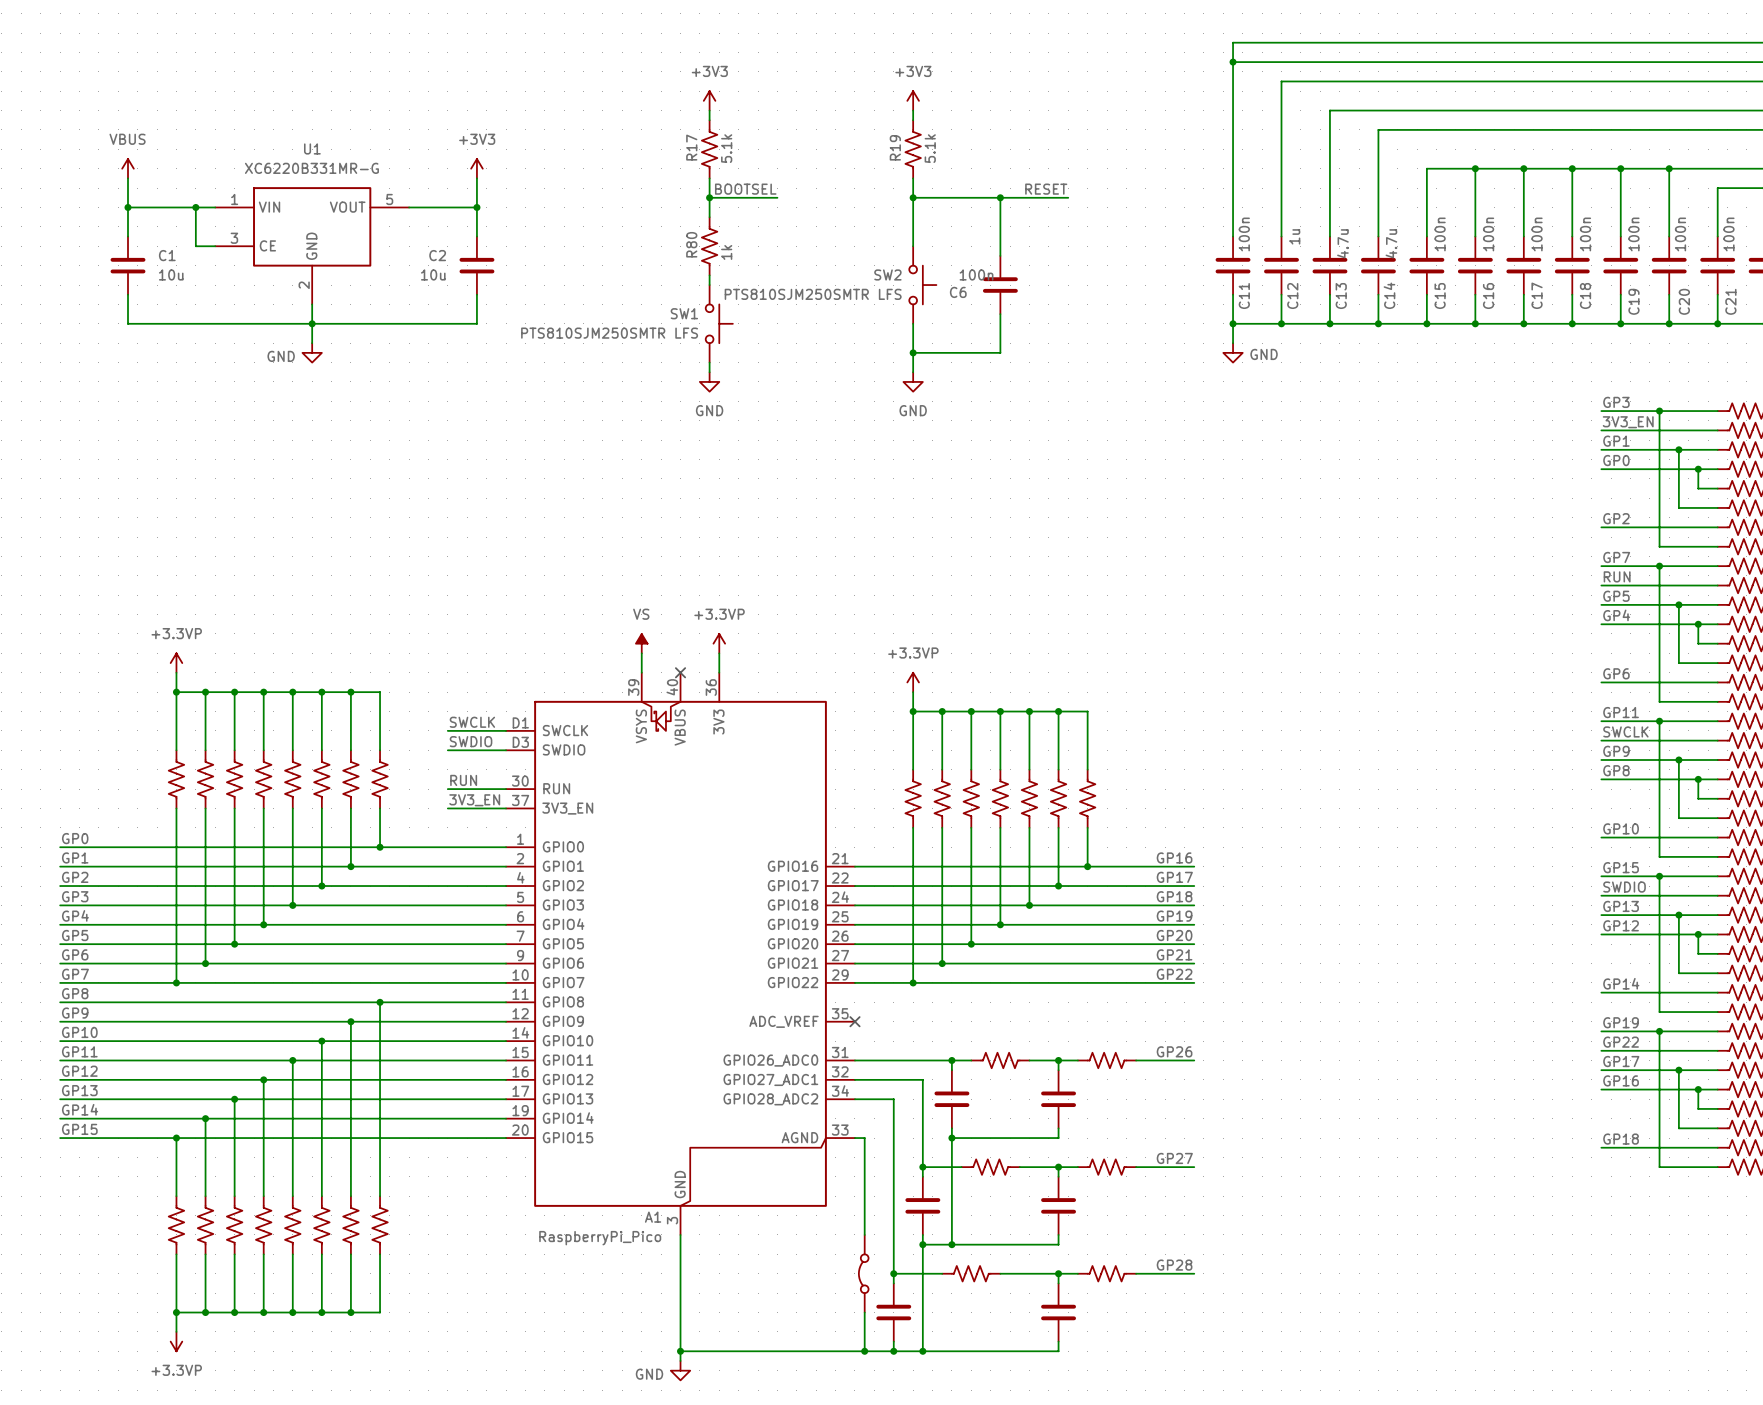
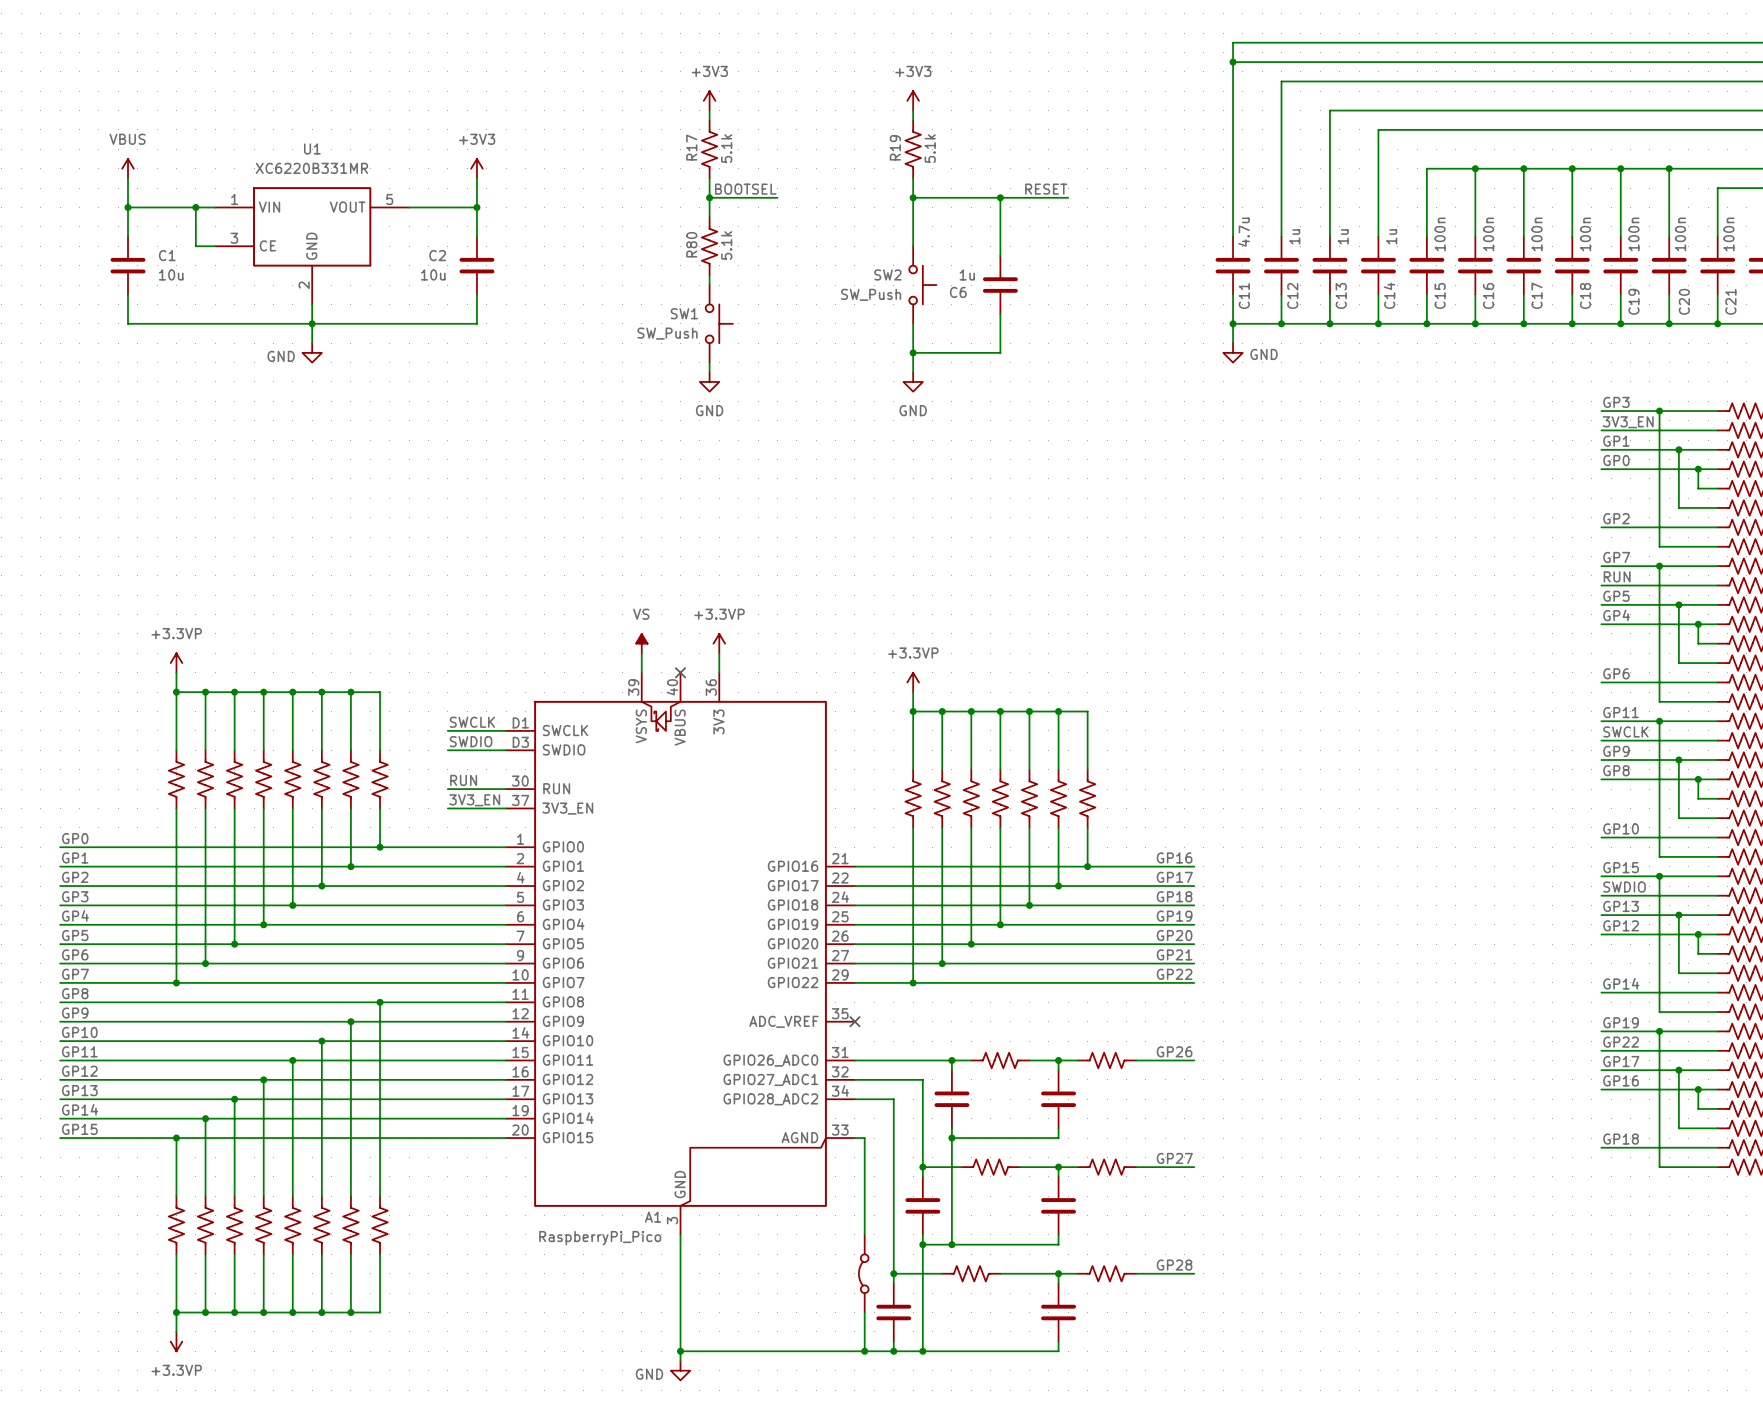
U1 value: XC6220B331MR-G (311, 168) -> XC6220B331MR (311, 168)
C11 value: 100n (1244, 234) -> 4.7u (1244, 232)
C13 value: 4.7u (1342, 243) -> 1u (1343, 236)
C14 value: 4.7u (1391, 243) -> 1u (1391, 236)
R80 value: 1k (726, 252) -> 5.1k (726, 245)
C6 value: 100n (976, 274) -> 1u (967, 274)
SW2 value: PTS810SJM250SMTR LFS (813, 294) -> SW_Push (871, 294)
SW1 value: PTS810SJM250SMTR LFS (609, 333) -> SW_Push (667, 333)

